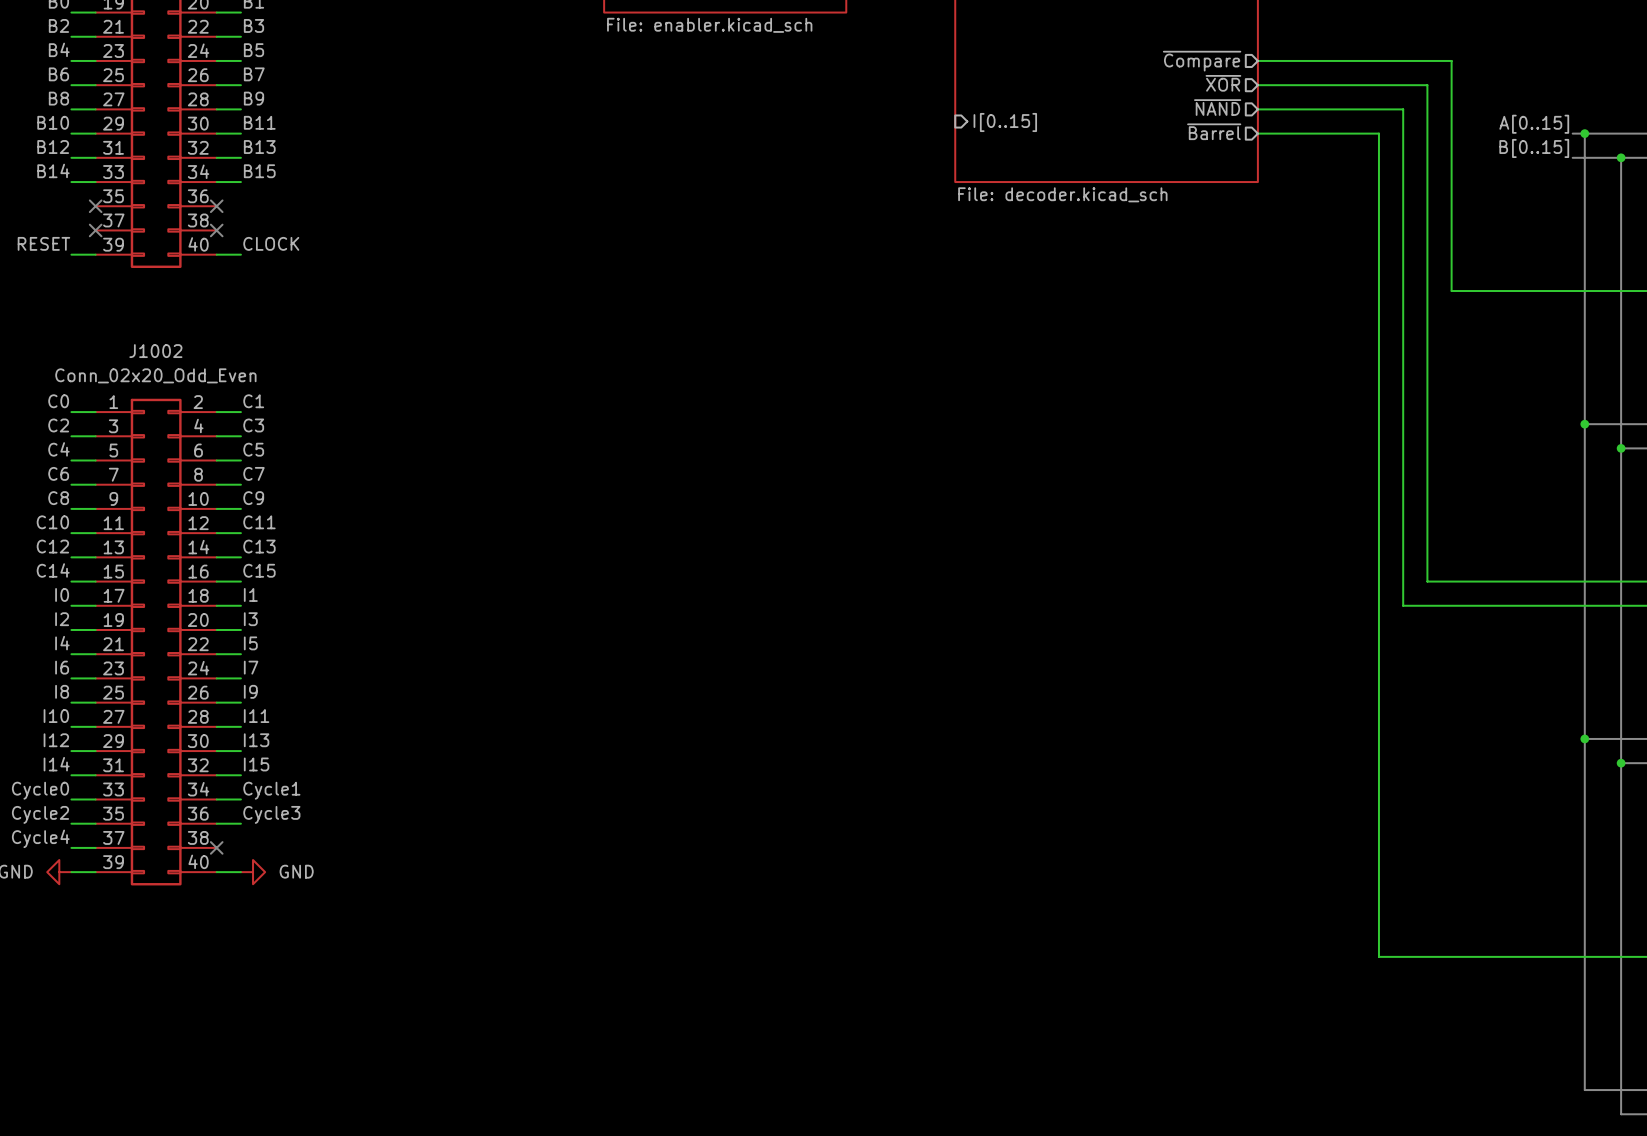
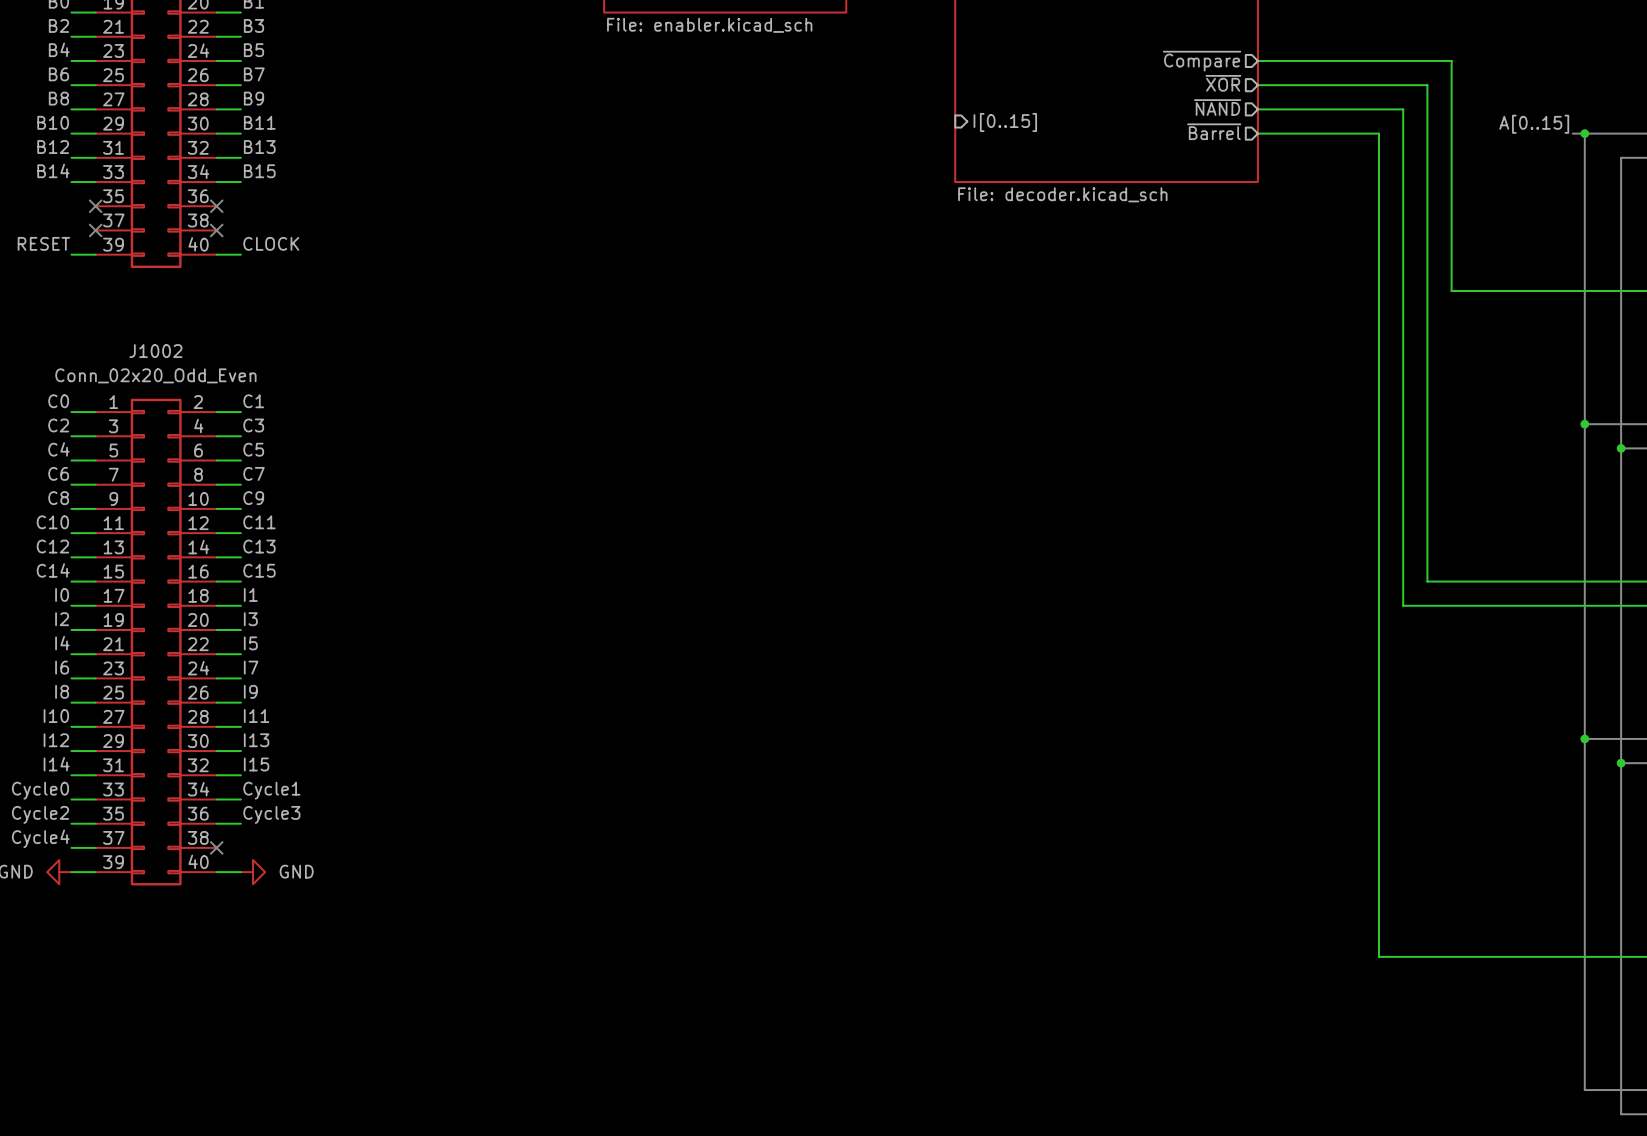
label: B[0..15] (1534, 148) -> none
bus: (1572, 157) (1621, 157) -> none
junction: (1621, 157) -> none

